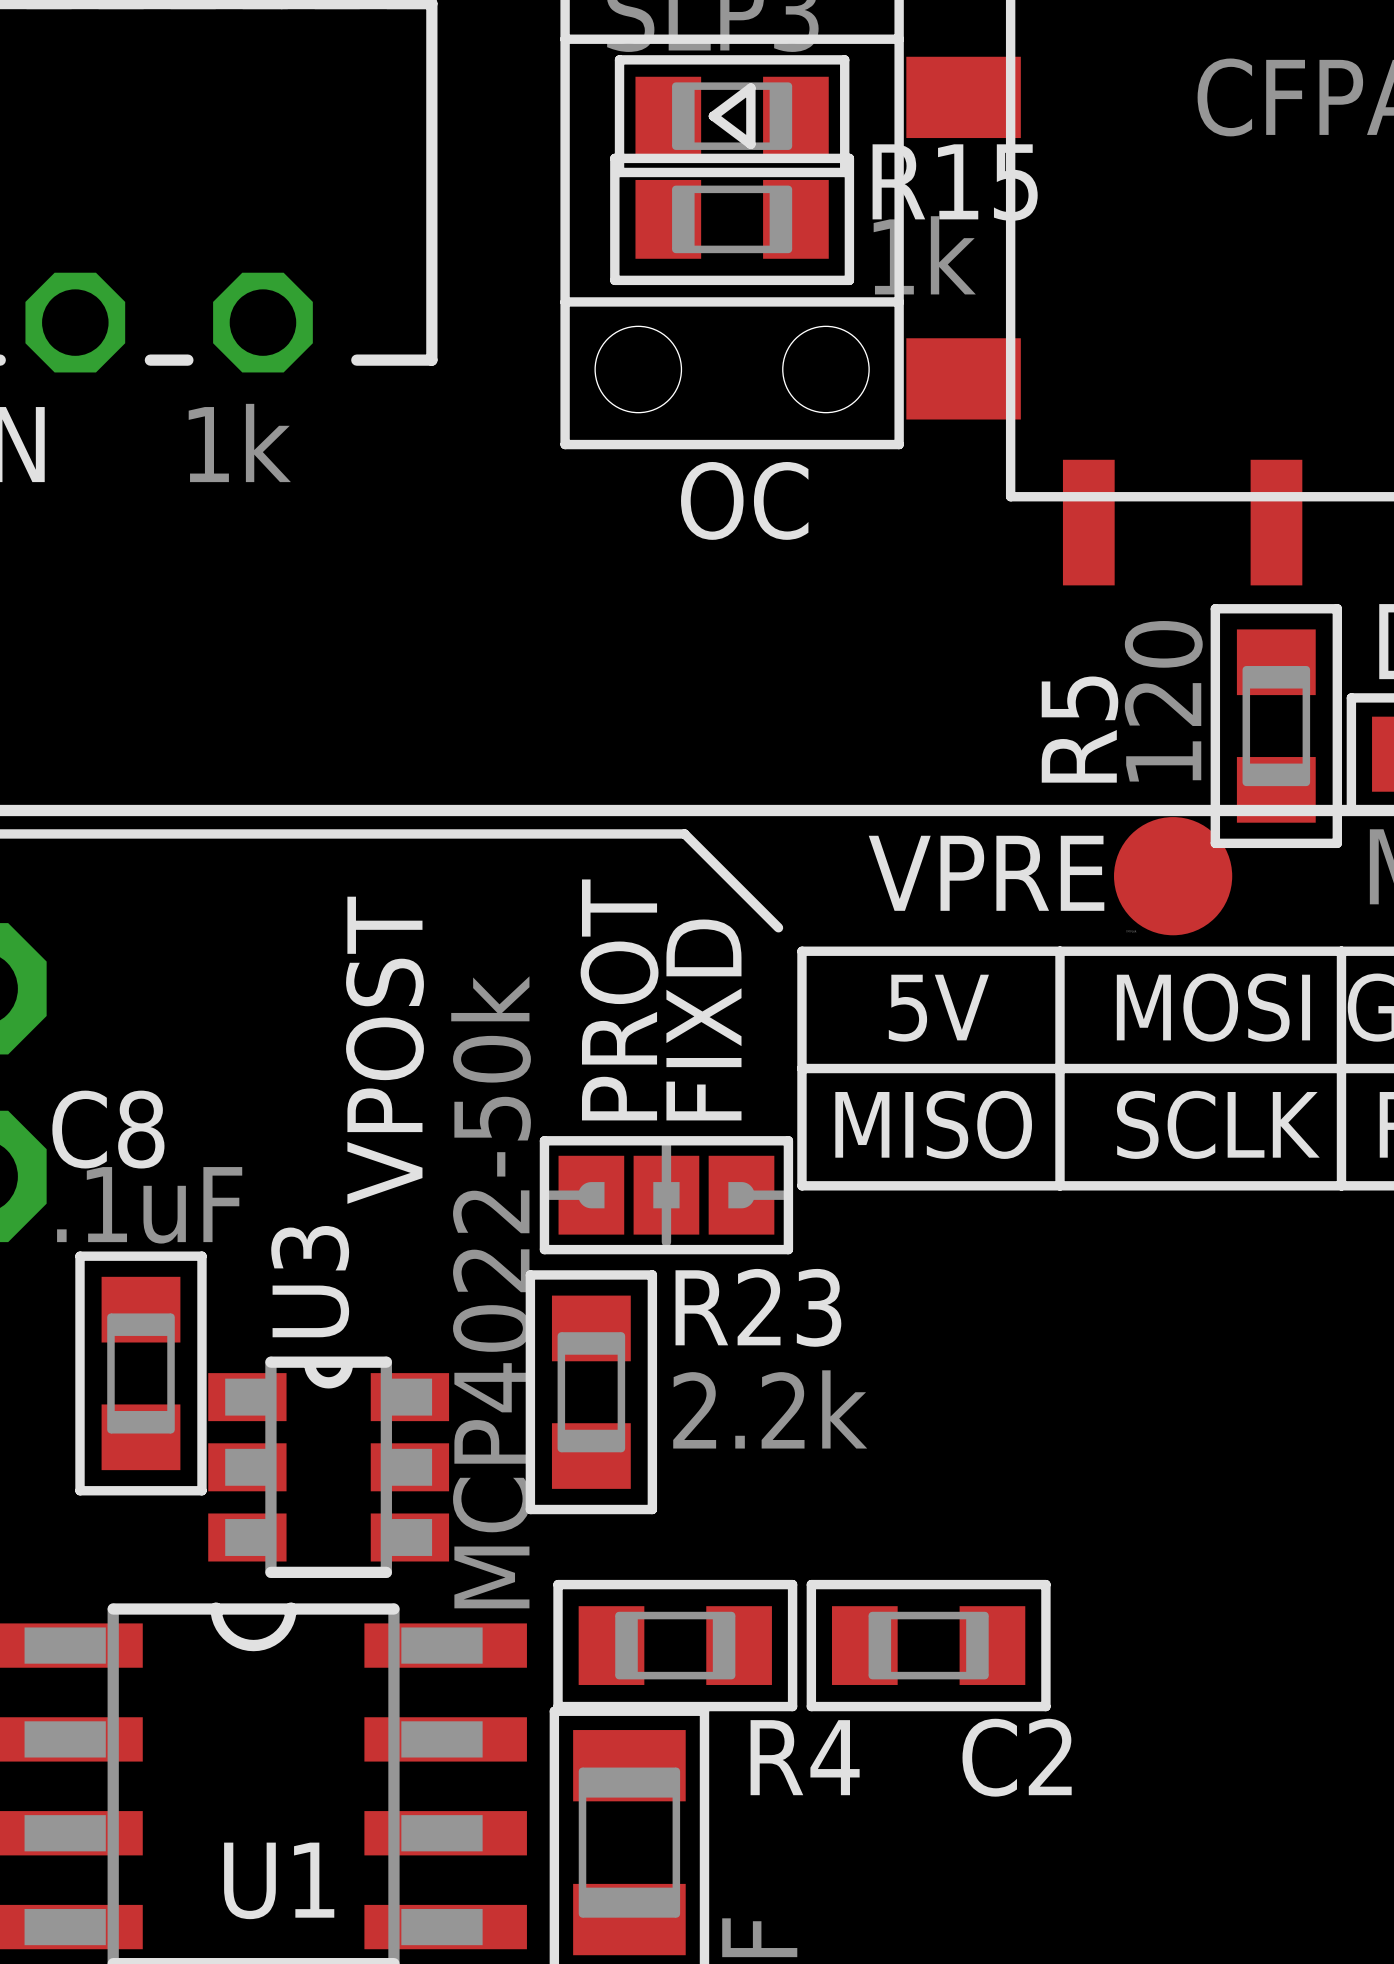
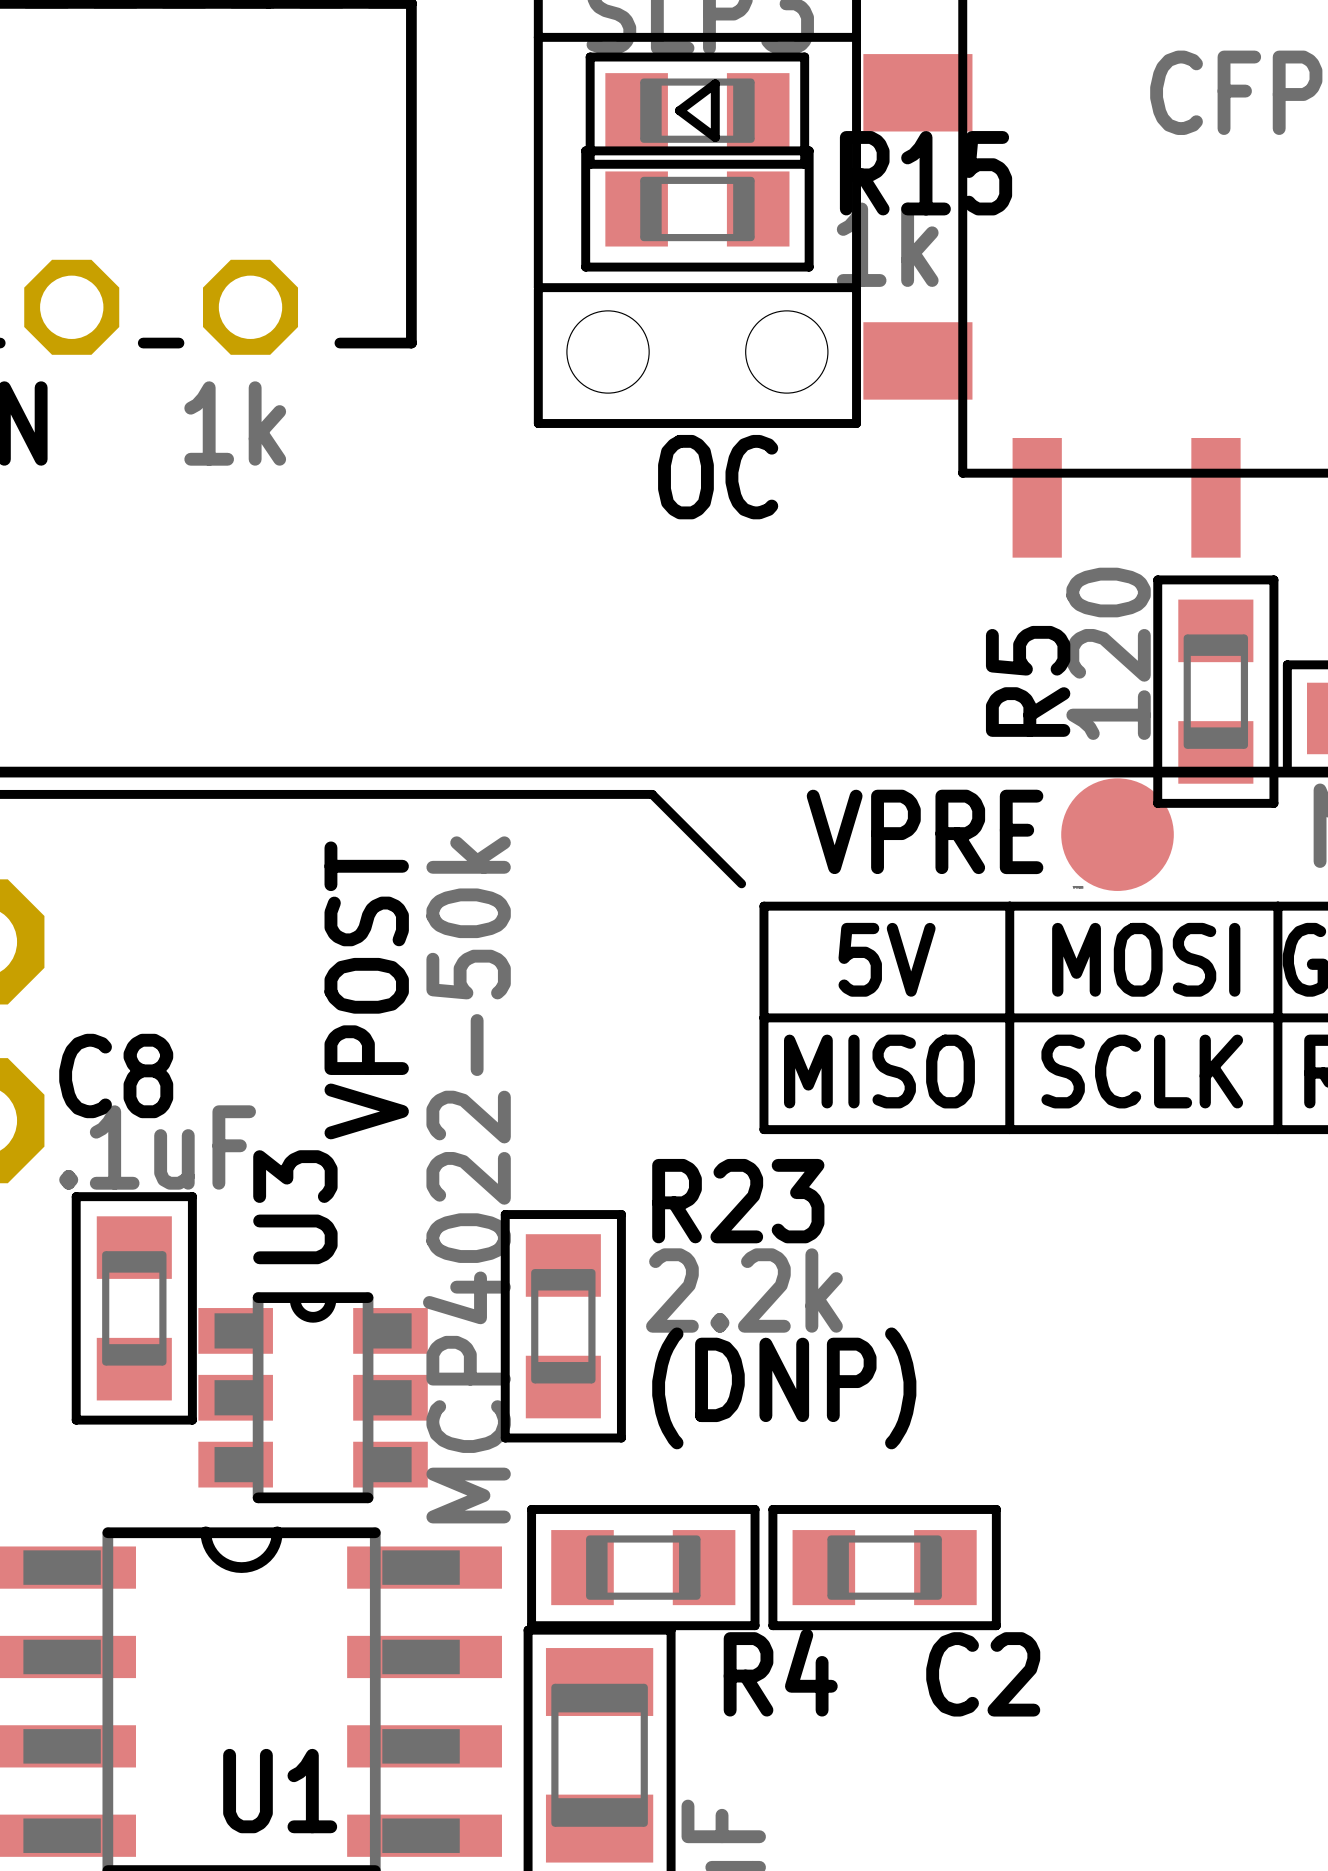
text: PROT (619, 999) -> none
text: FIXD (703, 1019) -> none
part: (666, 1195) -> none
R23 name position: R23 (758, 1307) -> R23 (738, 1201)
R23 value position: 2.2k (770, 1409) -> 2.2k (744, 1290)
text: none -> (DNP) (784, 1388)

